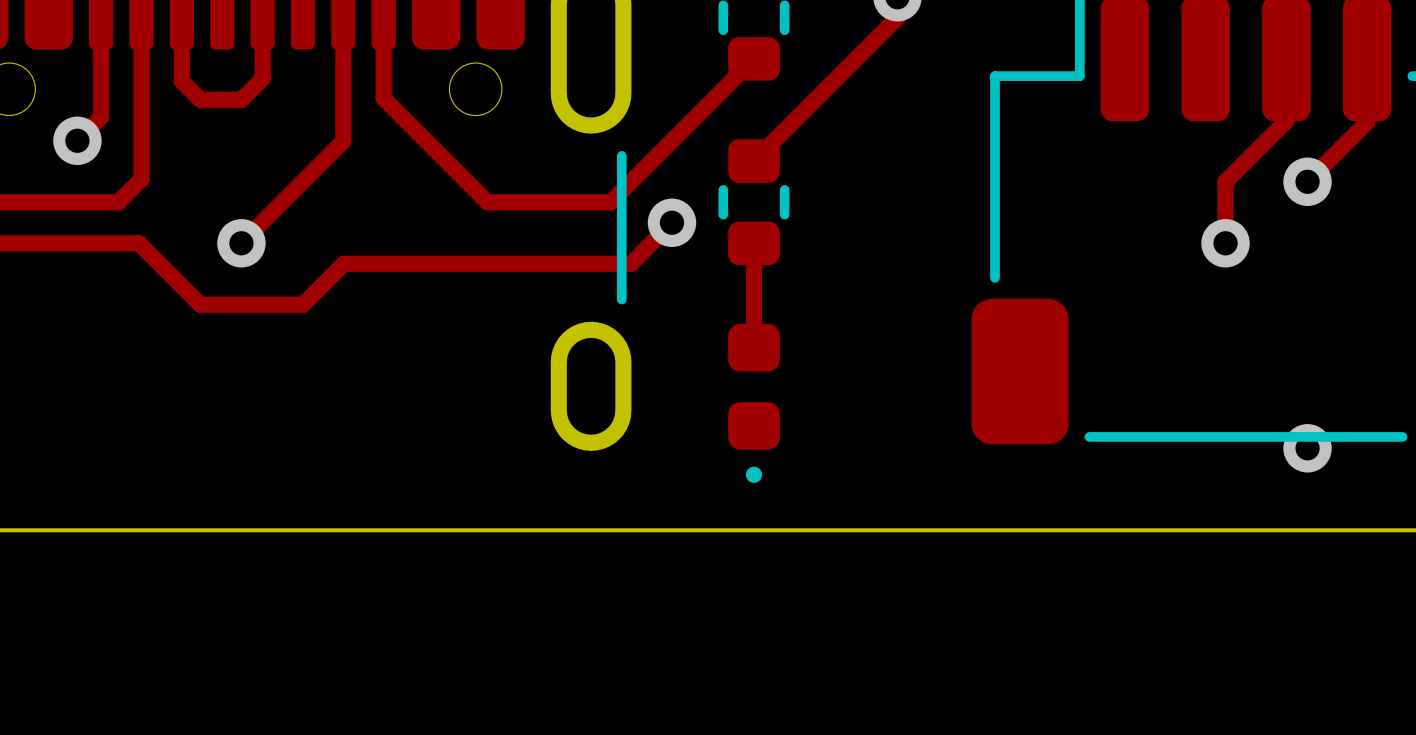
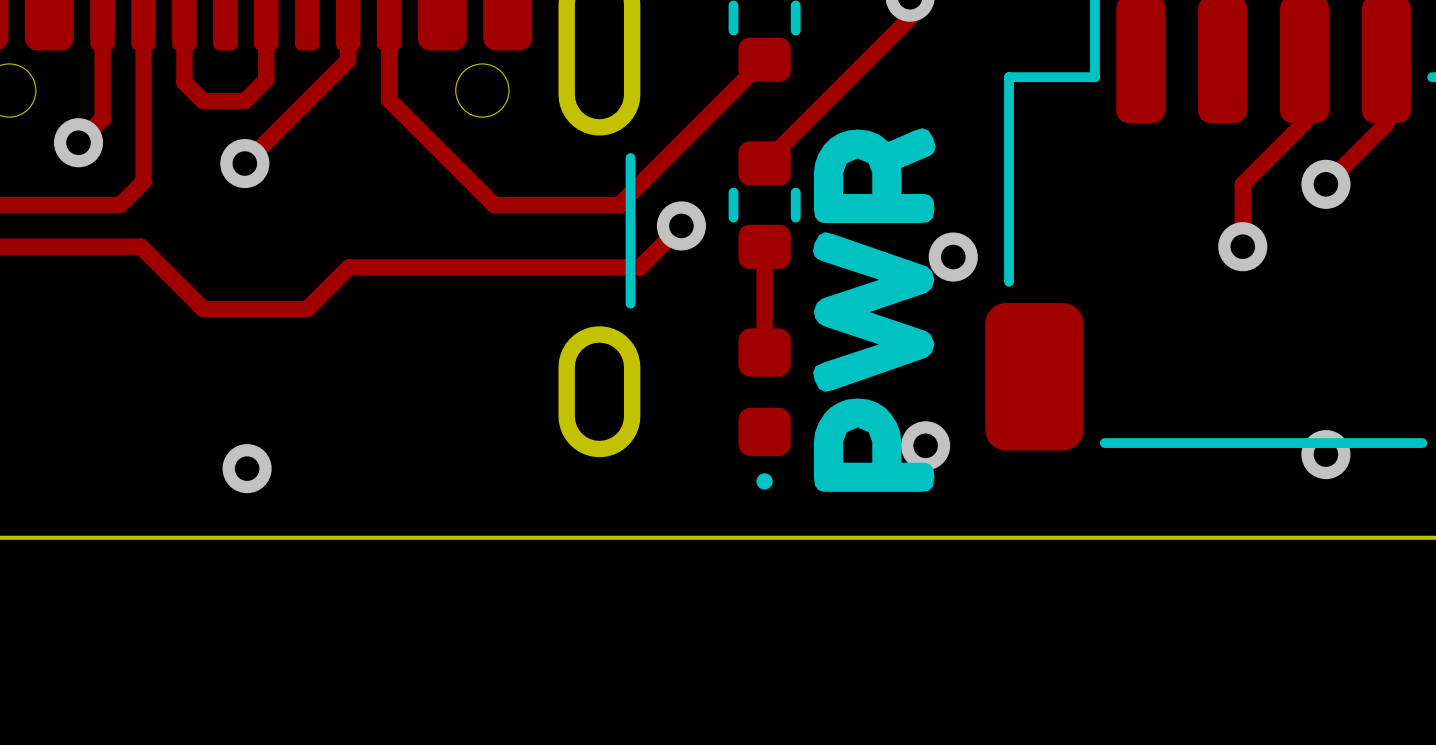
track: (343, 59) (343, 141) (241, 243) -> (348, 60) (244, 163)
drawing: none -> [812, 128, 936, 492]
via position: (241, 243) -> (244, 163)
via: none -> (953, 257)
via: none -> (925, 445)
via: none -> (247, 468)

